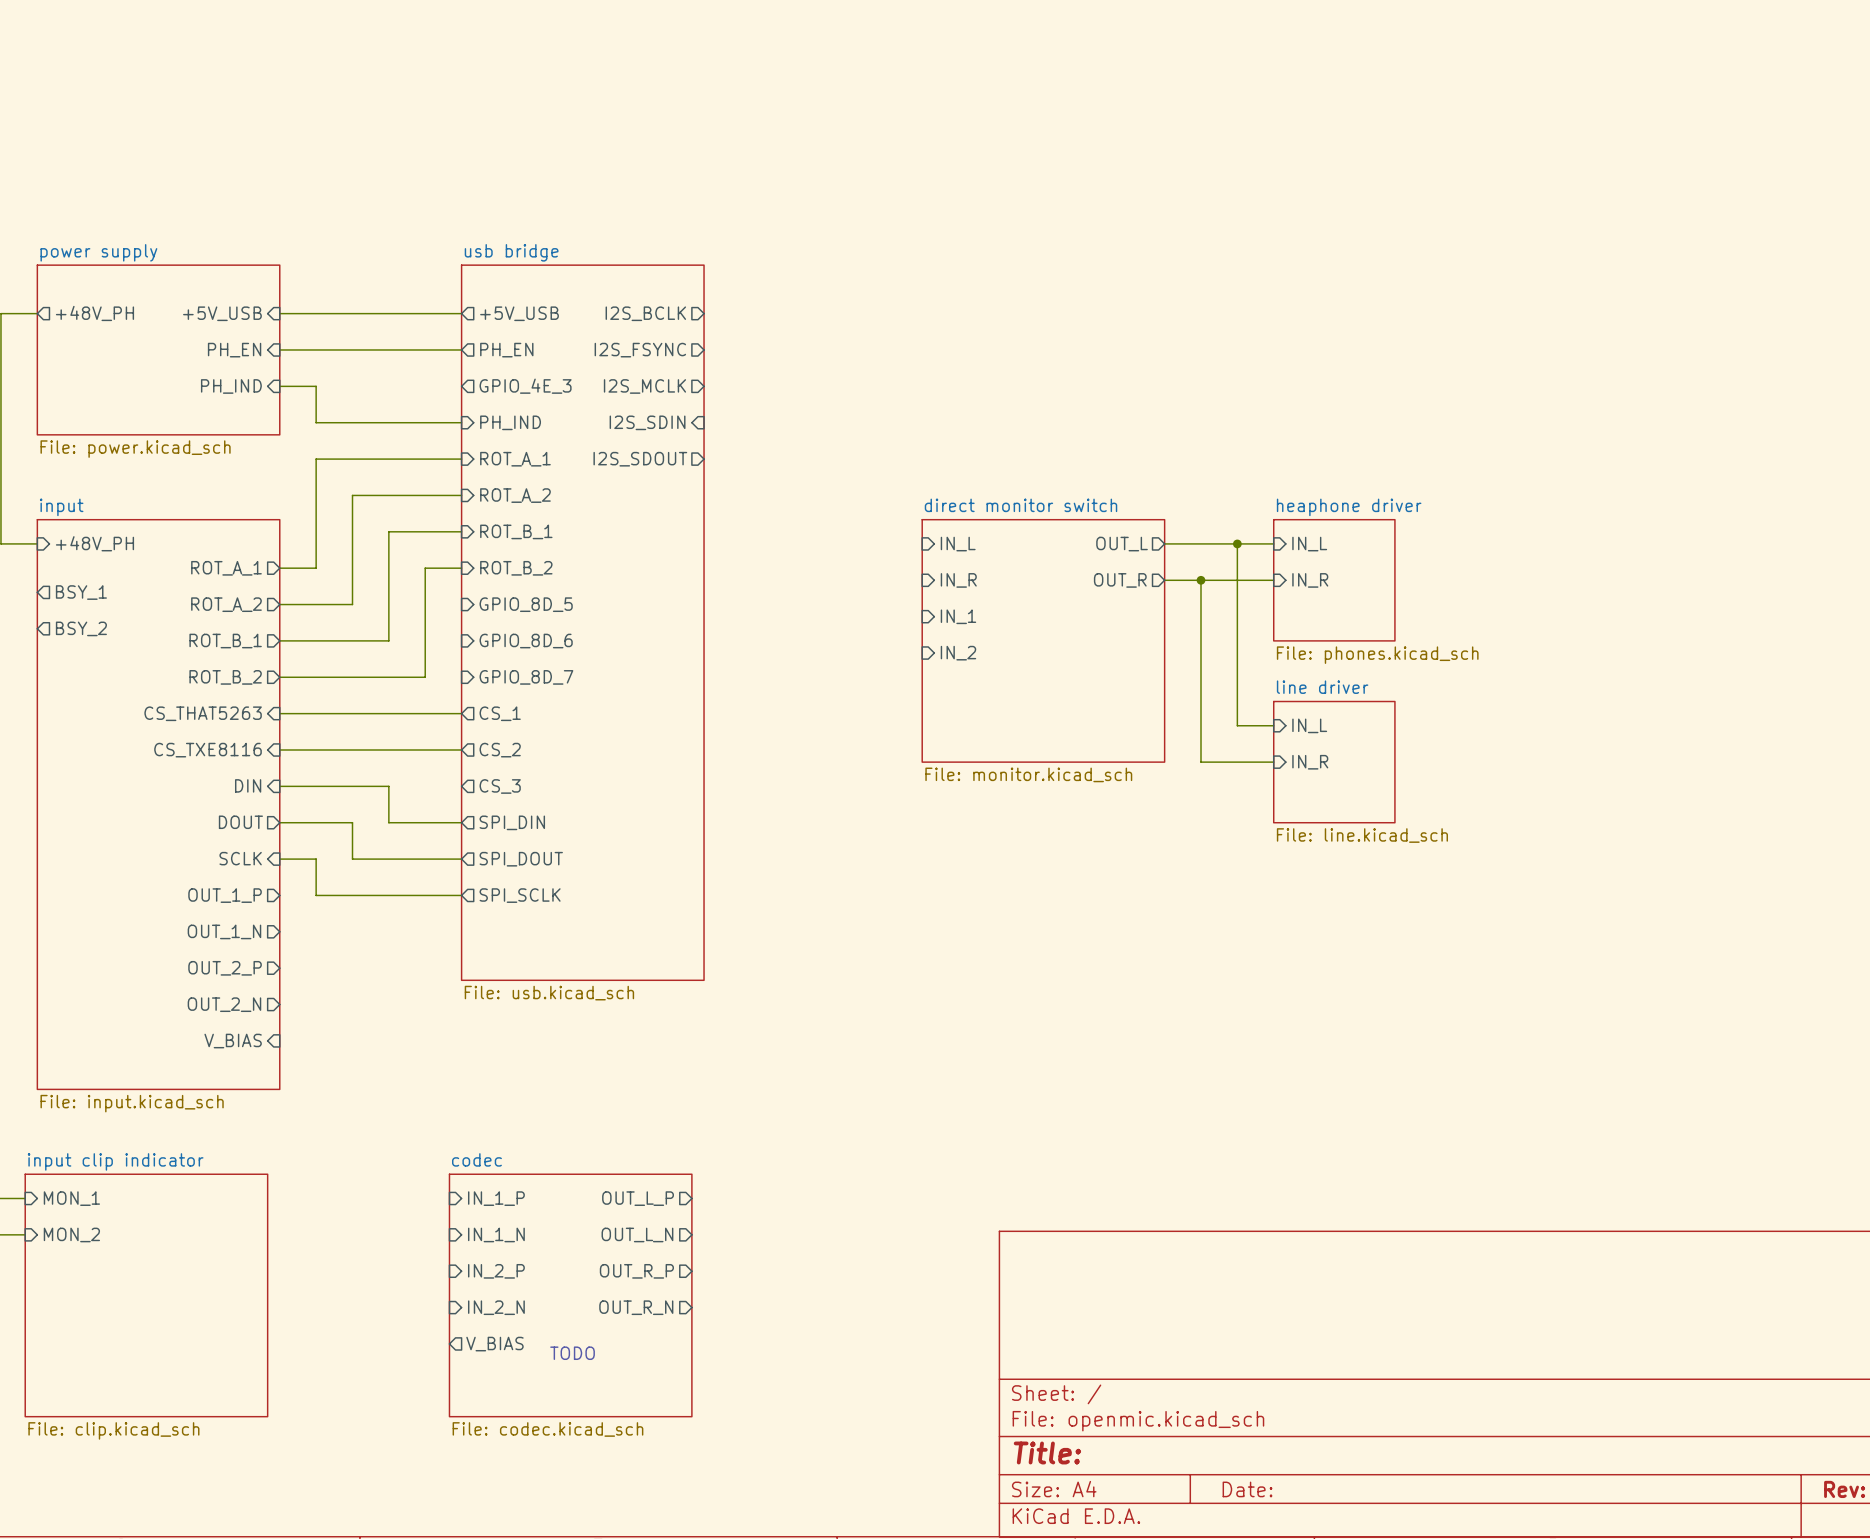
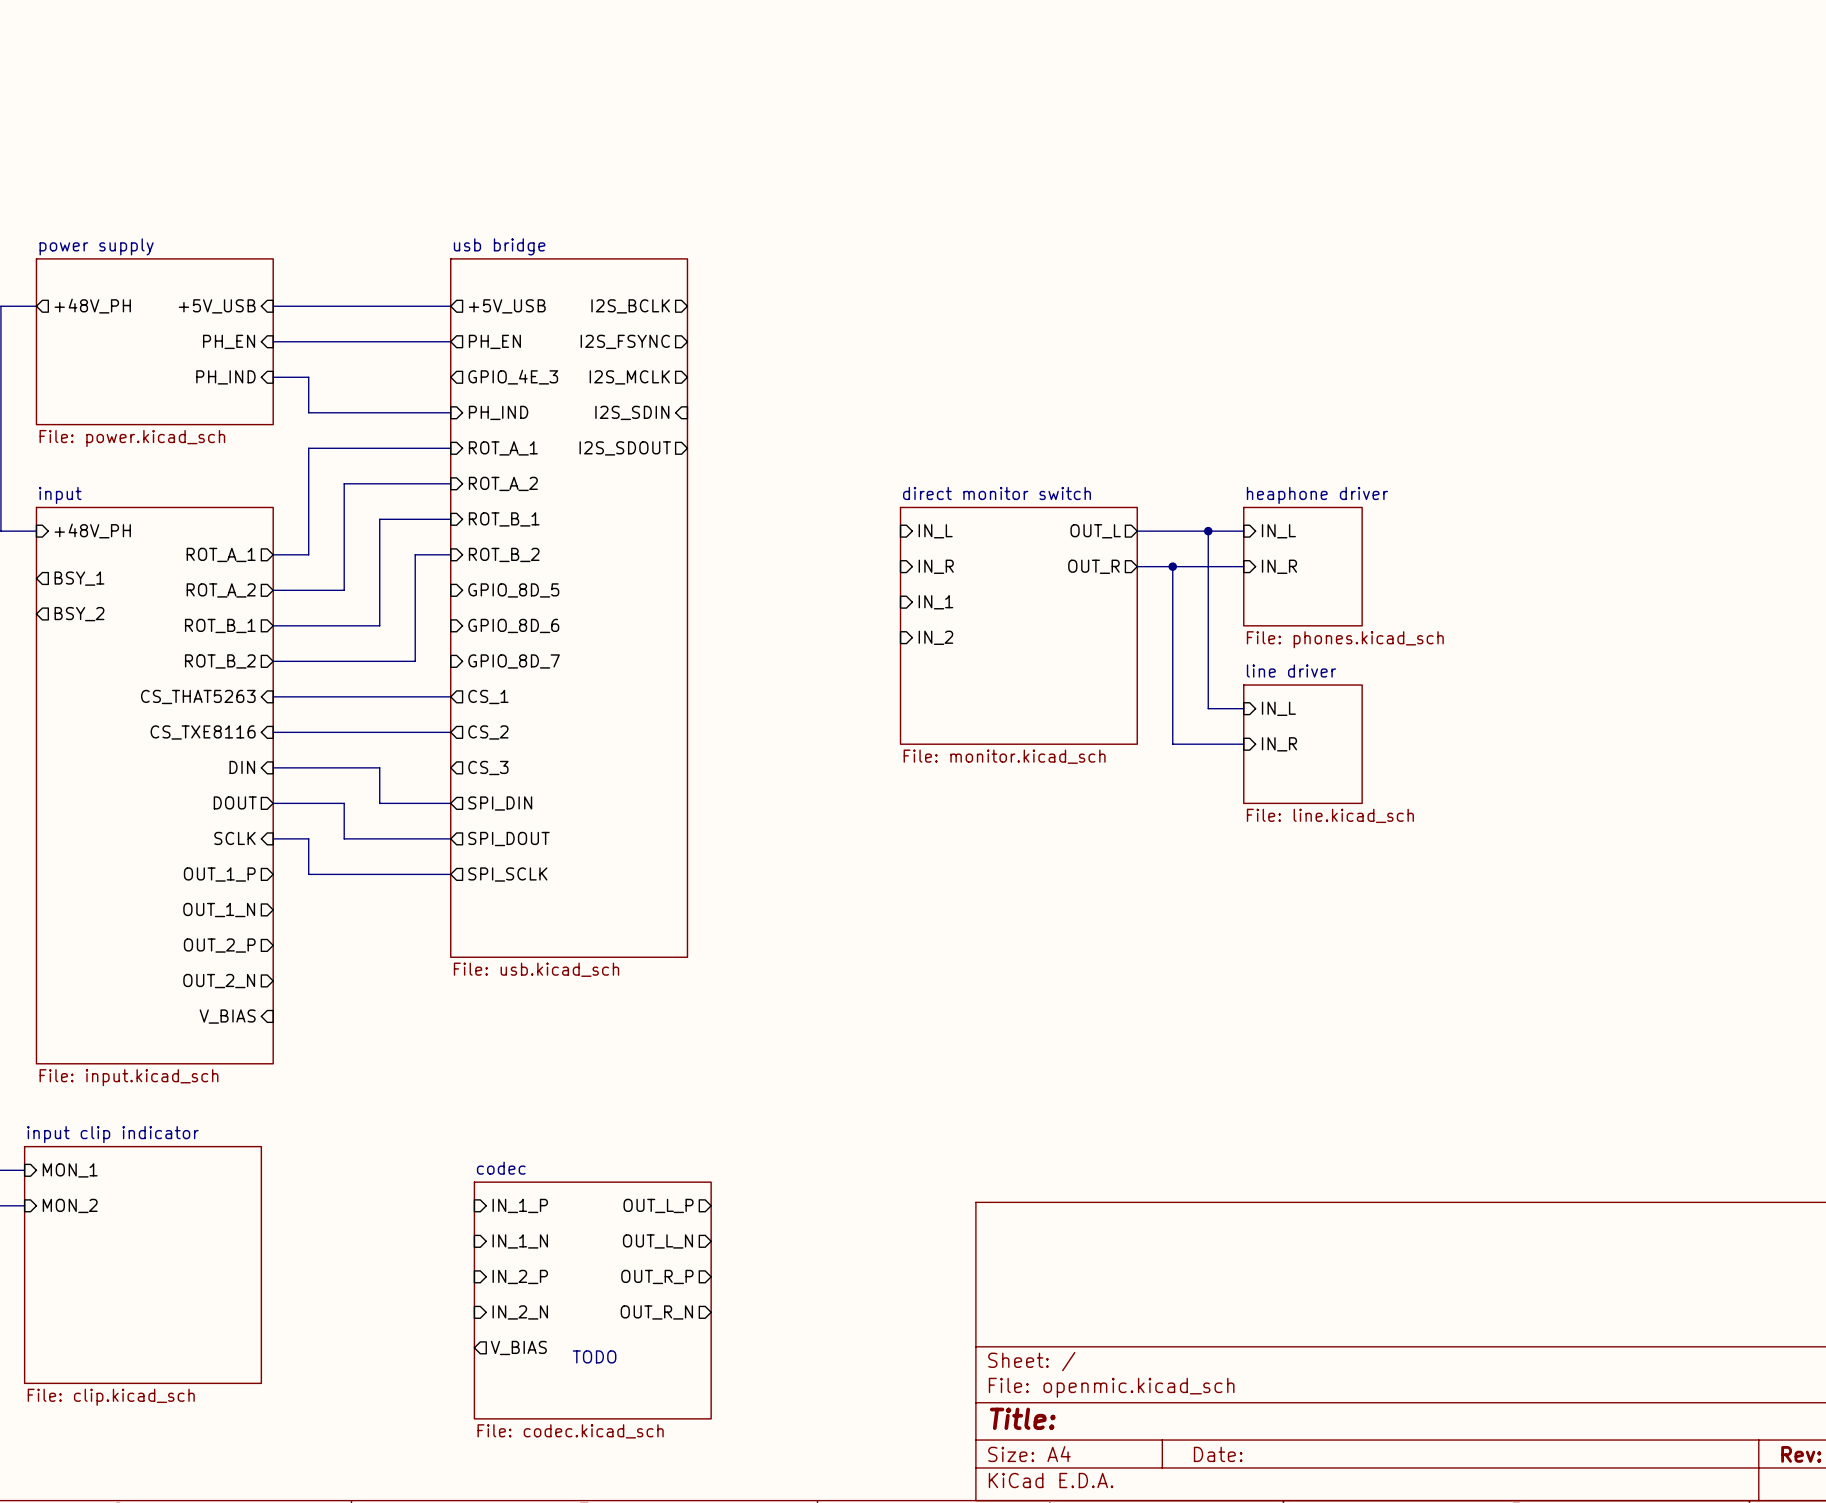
sheet pin position: IN_1_P (496, 1198) -> IN_1_P (520, 1205)
sheet pin position: OUT_L_P (638, 1198) -> OUT_L_P (658, 1205)
sheet pin position: IN_1_N (496, 1234) -> IN_1_N (520, 1241)
sheet pin position: OUT_L_N (637, 1234) -> OUT_L_N (657, 1241)
sheet pin position: IN_2_P (496, 1271) -> IN_2_P (520, 1276)
sheet pin position: OUT_R_P (636, 1271) -> OUT_R_P (657, 1276)
sheet codec position: (570, 1295) -> (592, 1300)
sheet pin position: IN_2_N (496, 1307) -> IN_2_N (520, 1312)
sheet pin position: OUT_R_N (636, 1307) -> OUT_R_N (656, 1312)
sheet pin position: V_BIAS (494, 1344) -> V_BIAS (518, 1347)
text position: TODO (572, 1353) -> TODO (594, 1356)

